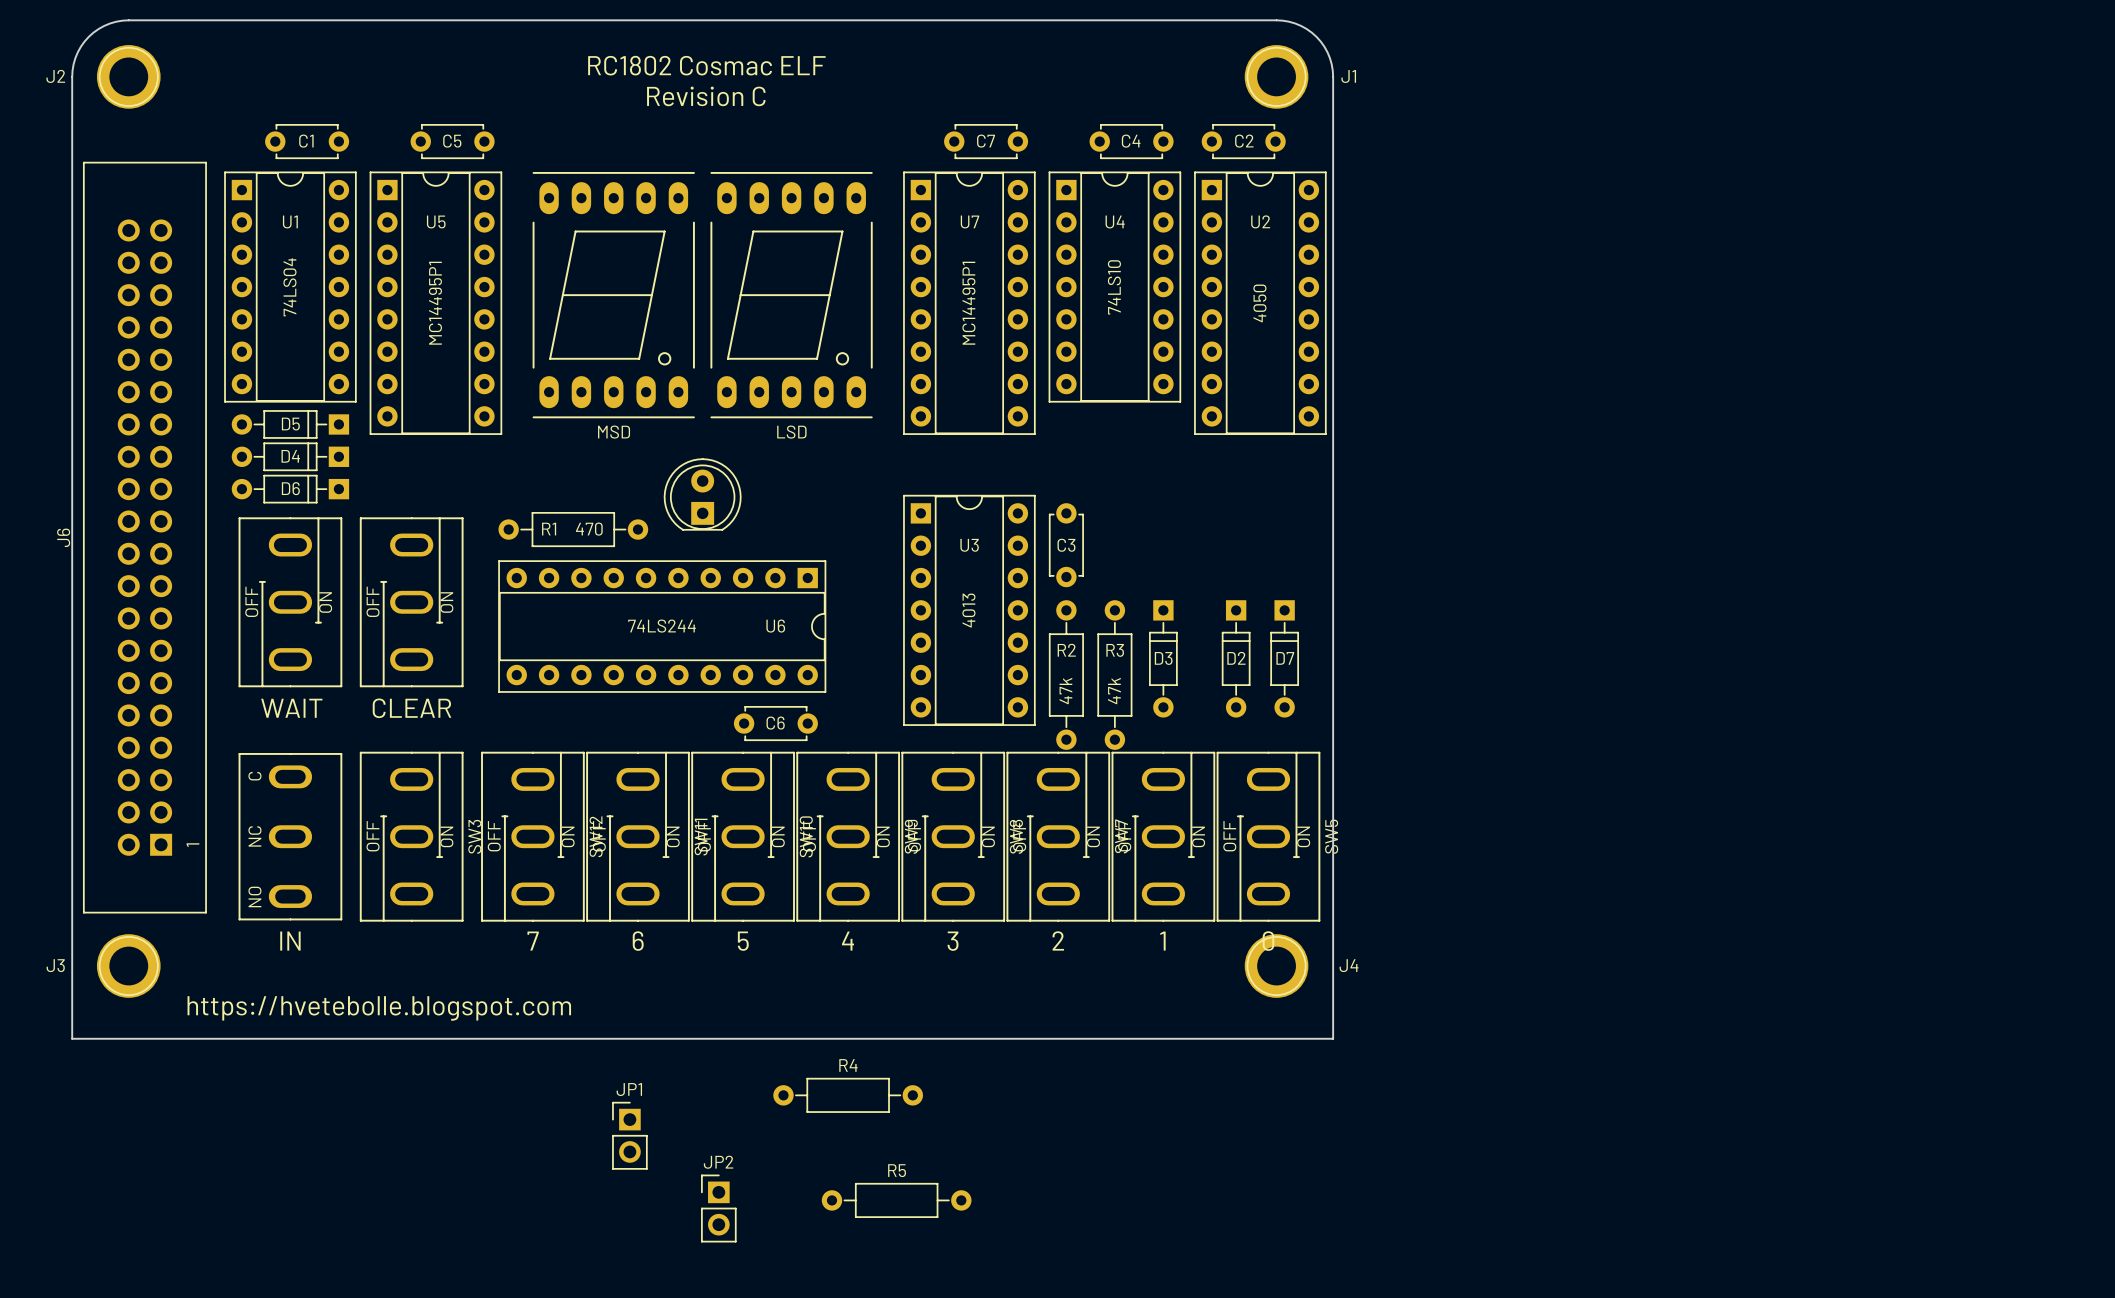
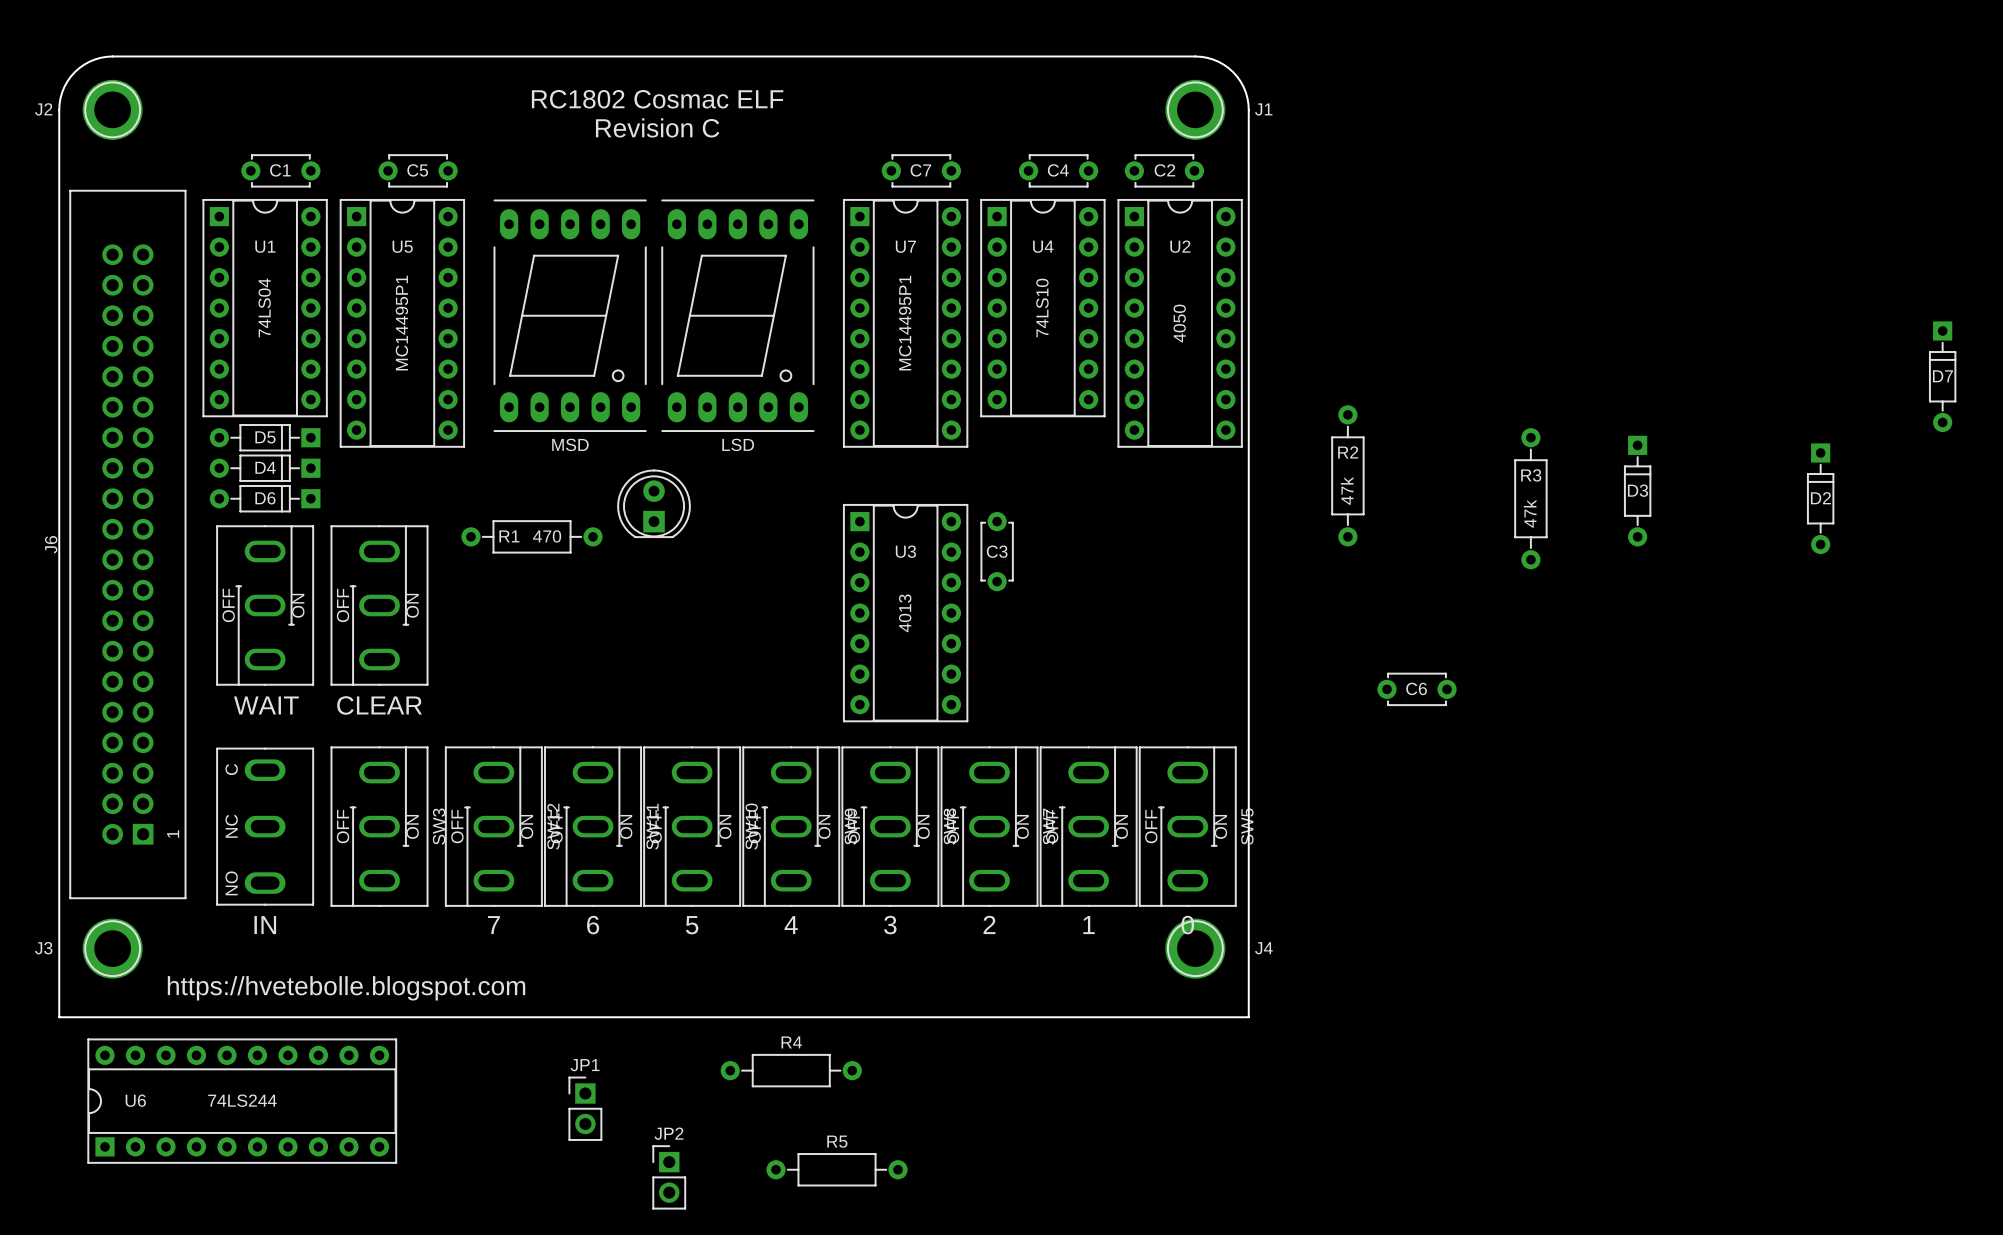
U6 rotation: 0° (662, 626) -> 180° (242, 1101)
U6 position: (662, 626) -> (242, 1101)
D3 position: (1163, 658) -> (1637, 491)
D2 position: (1236, 658) -> (1820, 498)
D7 position: (1284, 658) -> (1942, 376)
R2 position: (1066, 675) -> (1347, 475)
R3 position: (1114, 675) -> (1530, 498)
C6 position: (775, 723) -> (1417, 689)

